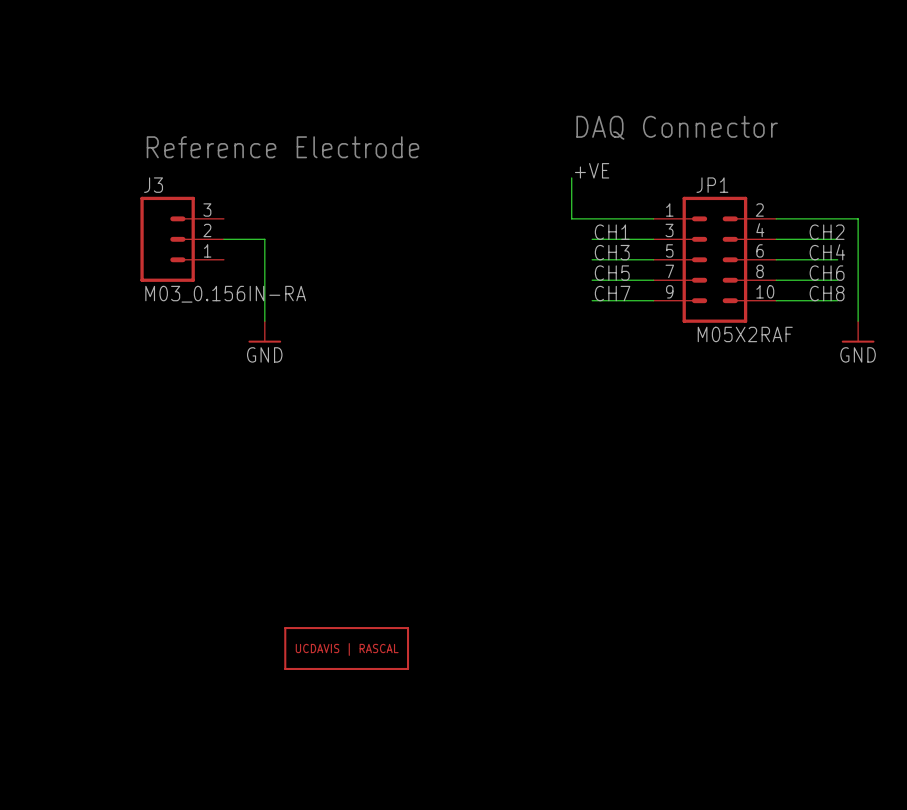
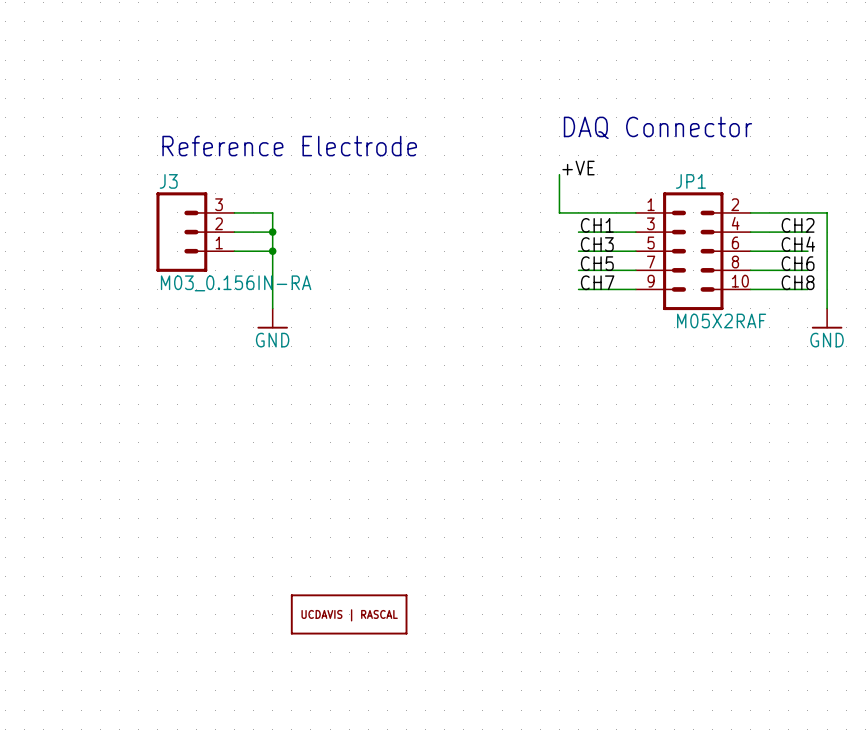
wire: none -> (234, 212) (272, 212) (272, 232)
junction: none -> (272, 232)
wire: none -> (234, 251) (272, 251)
junction: none -> (272, 251)

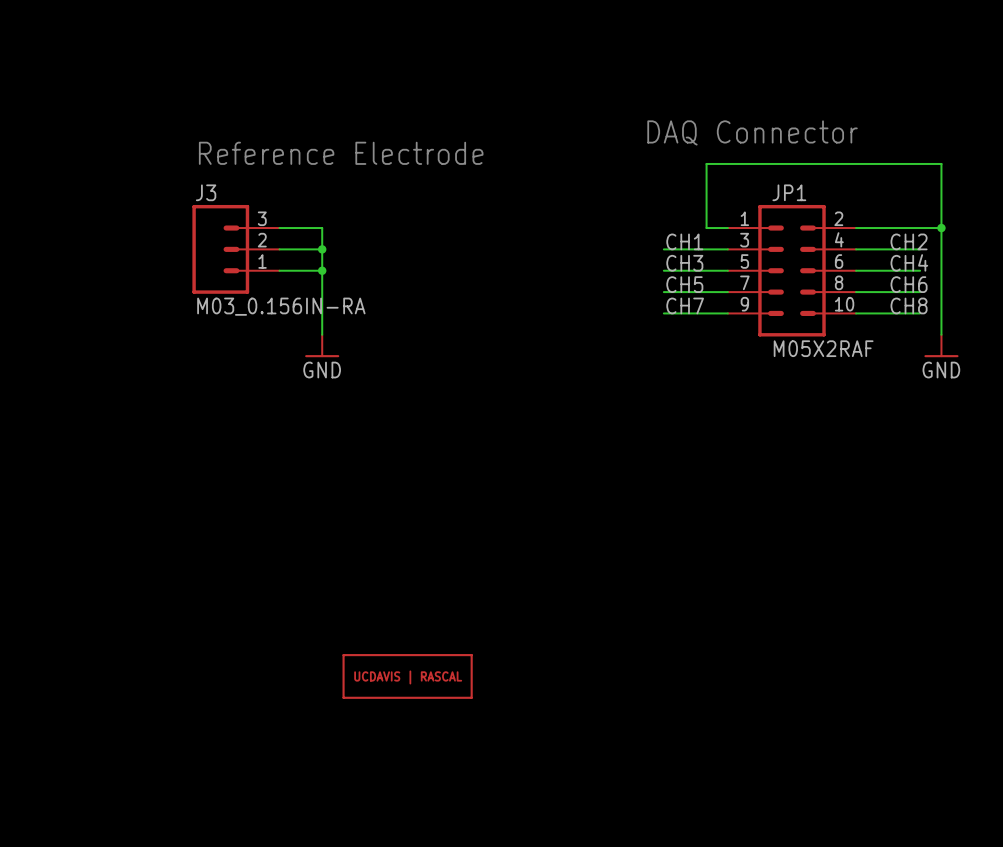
label: +VE (578, 168) -> none
wire: (559, 174) (559, 212) (616, 212) -> (941, 228) (941, 163) (706, 163) (706, 228)
junction: none -> (941, 228)

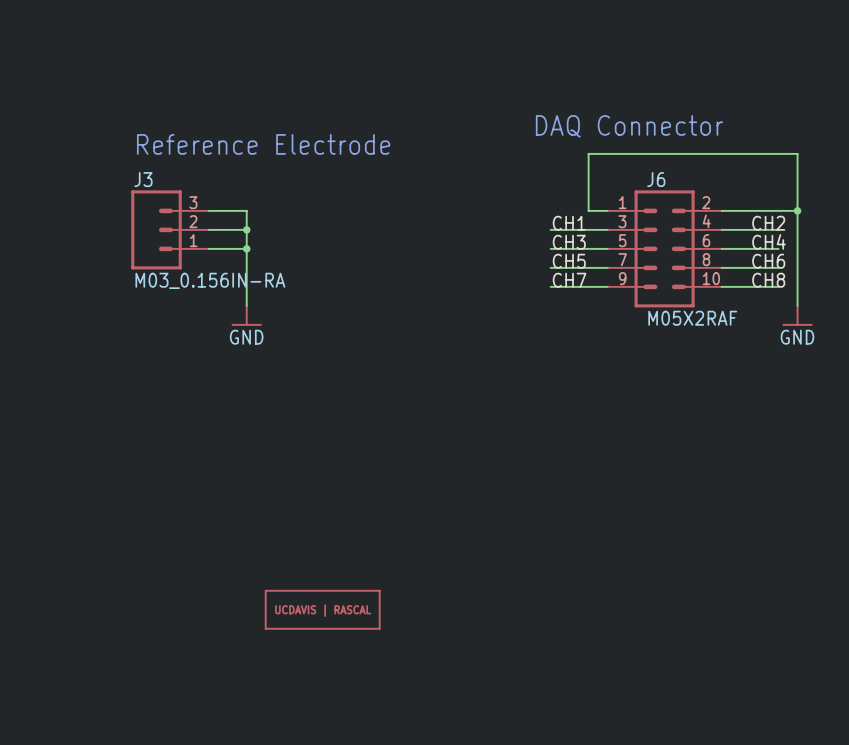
JP1 name: JP1 (789, 192) -> J6 (656, 179)

